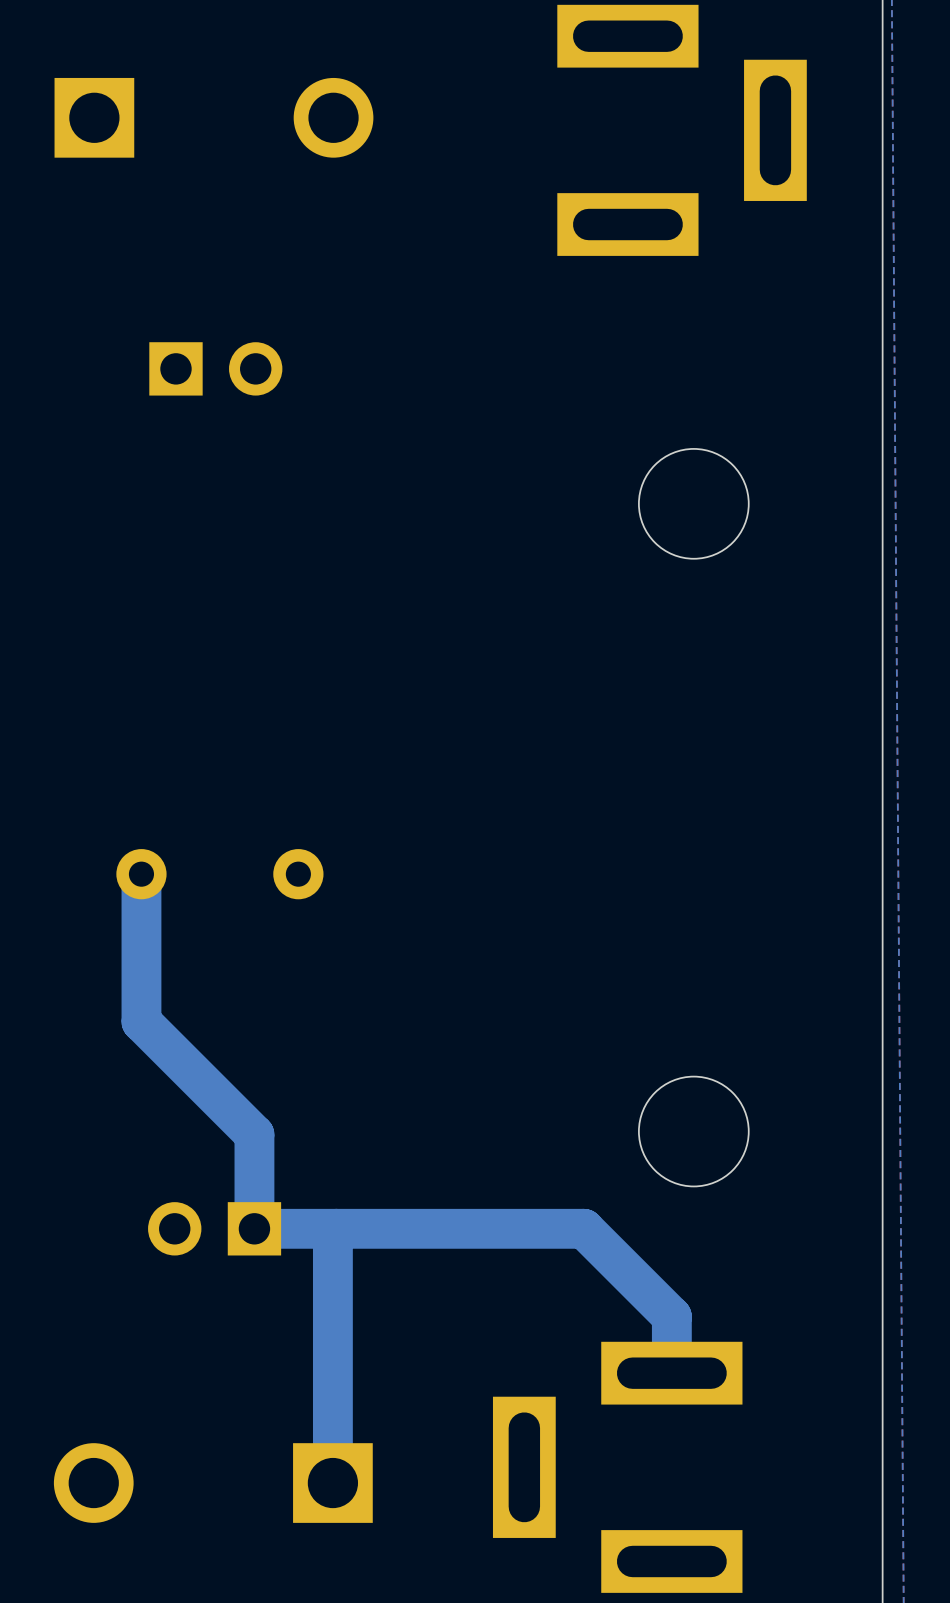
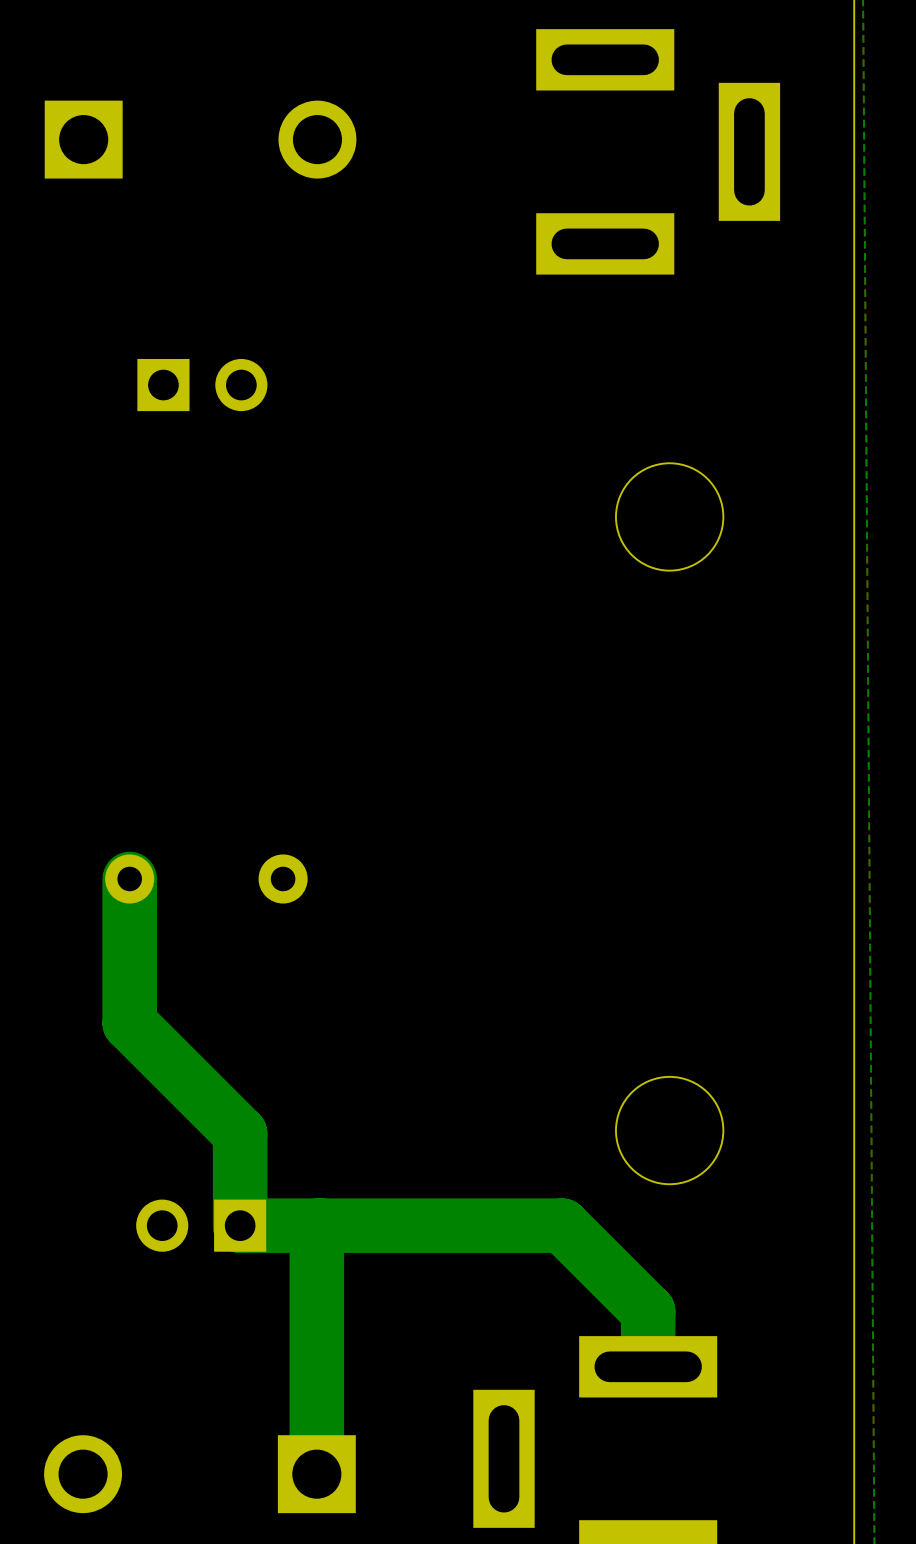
bottom track width: thin (141, 874) (141, 1021) (254, 1134) (254, 1228) (583, 1228) (671, 1316) (671, 1373) -> thick (129, 878) (129, 1023) (240, 1133) (240, 1225) (562, 1225) (648, 1311) (648, 1366)
bottom track width: thin (336, 1228) (332, 1231) (332, 1483) -> thick (319, 1225) (316, 1228) (316, 1474)

